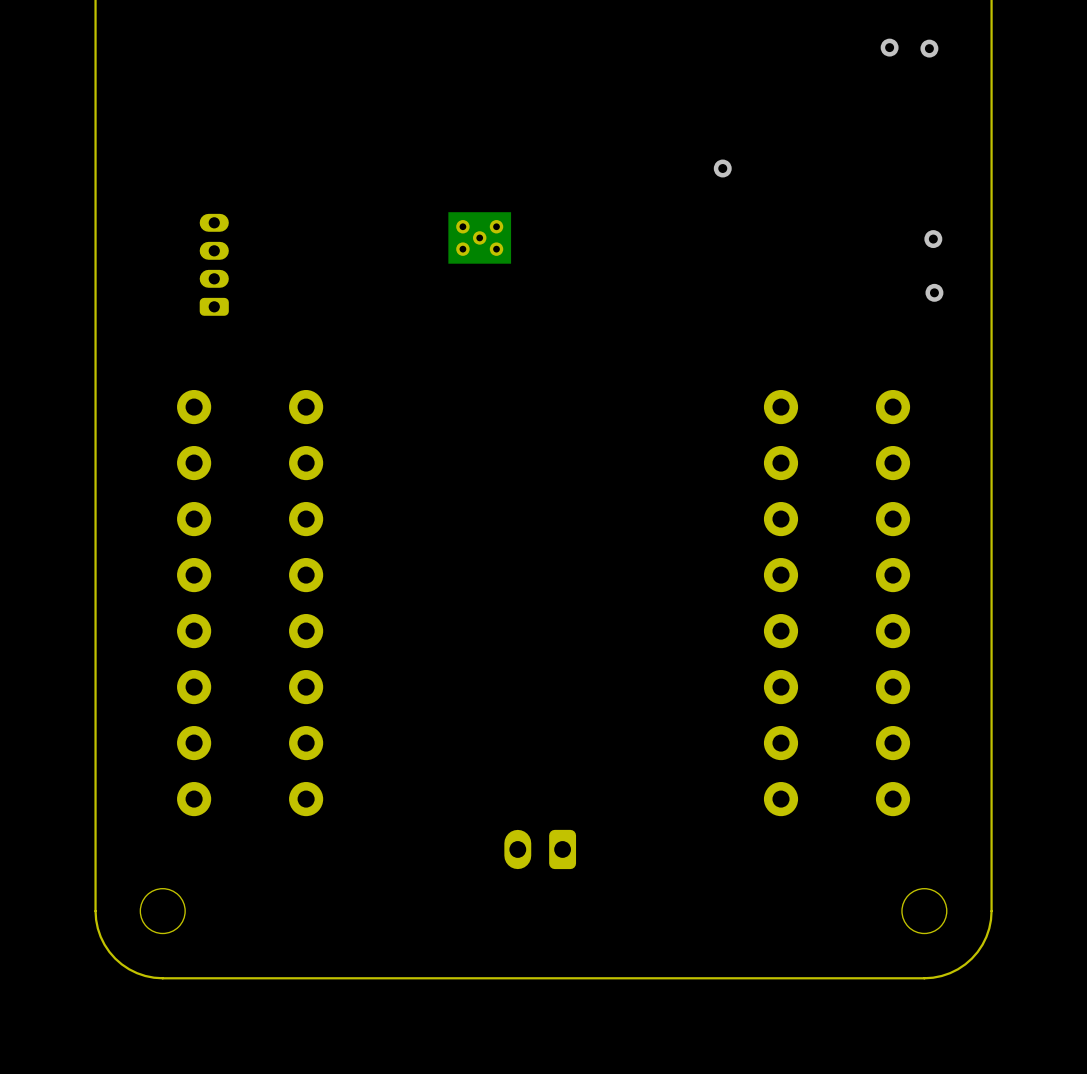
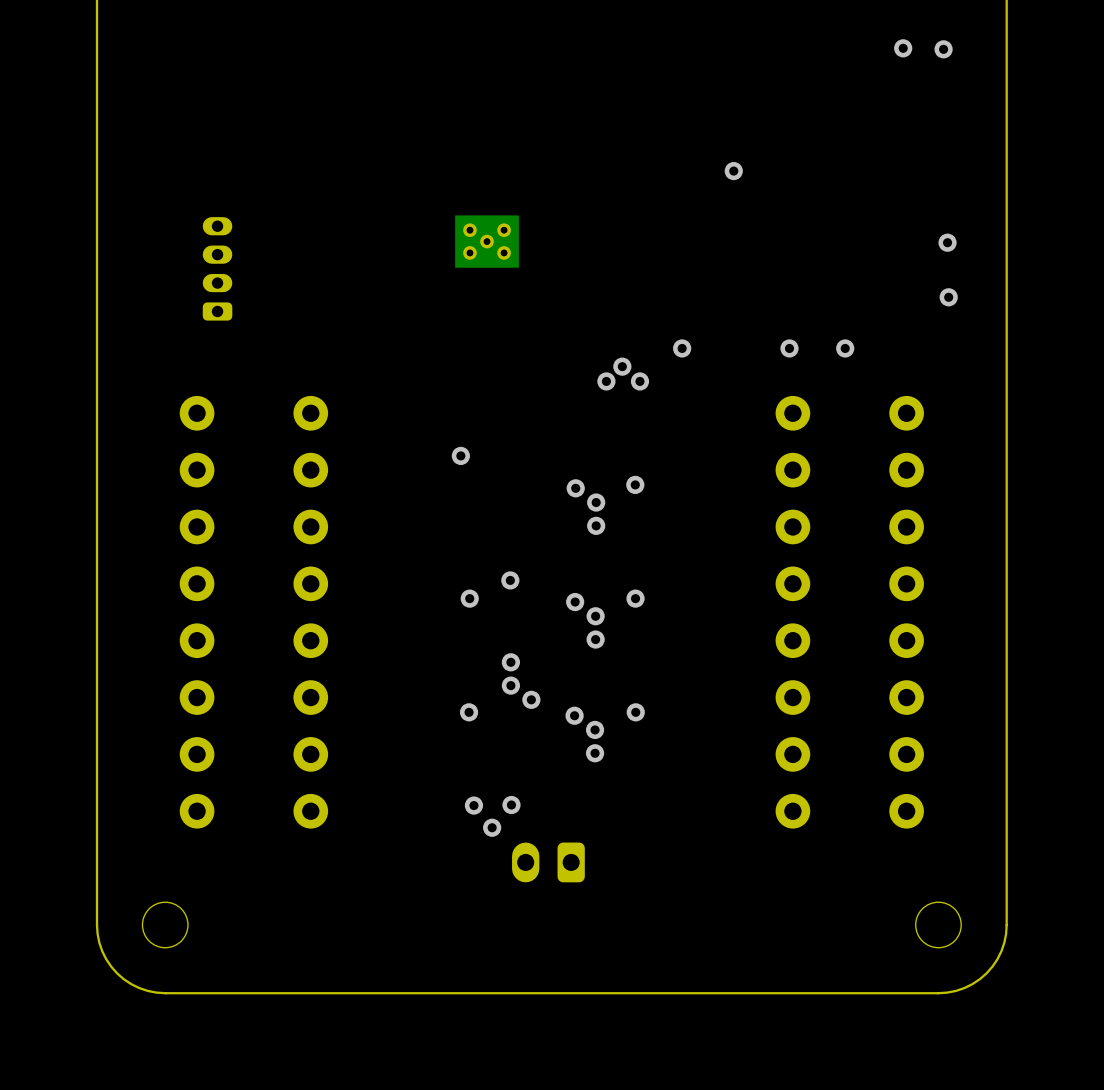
via: none -> (682, 348)
via: none -> (789, 348)
via: none -> (845, 348)
via: none -> (622, 366)
via: none -> (606, 381)
via: none -> (639, 381)
via: none -> (460, 455)
via: none -> (635, 484)
via: none -> (575, 488)
via: none -> (596, 502)
via: none -> (596, 525)
via: none -> (510, 580)
via: none -> (469, 598)
via: none -> (635, 598)
via: none -> (575, 602)
via: none -> (595, 616)
via: none -> (595, 639)
via: none -> (510, 662)
via: none -> (510, 685)
via: none -> (531, 699)
via: none -> (469, 712)
via: none -> (635, 712)
via: none -> (574, 715)
via: none -> (595, 729)
via: none -> (595, 753)
via: none -> (511, 805)
via: none -> (473, 805)
via: none -> (492, 827)

